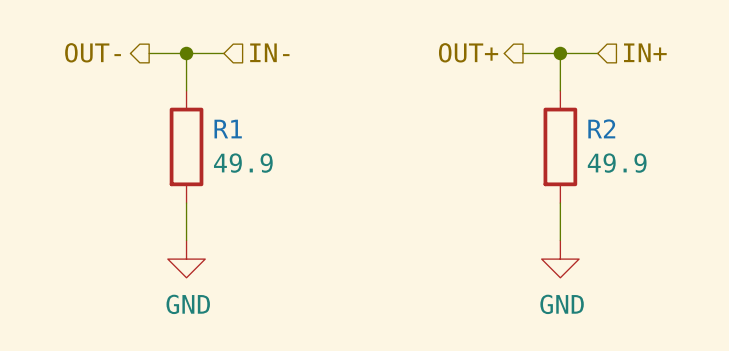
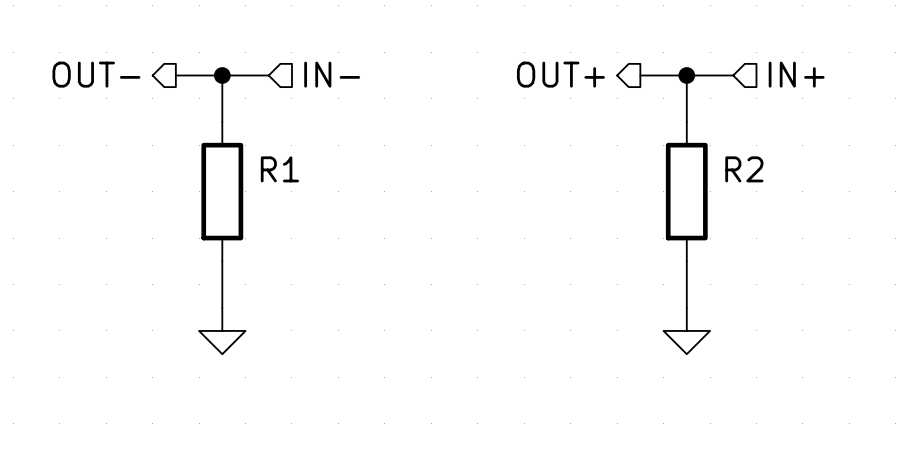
R1 value: 49.9 (243, 163) -> none
R2 value: 49.9 (617, 163) -> none
power symbol text: GND (188, 304) -> none
power symbol text: GND (562, 304) -> none

